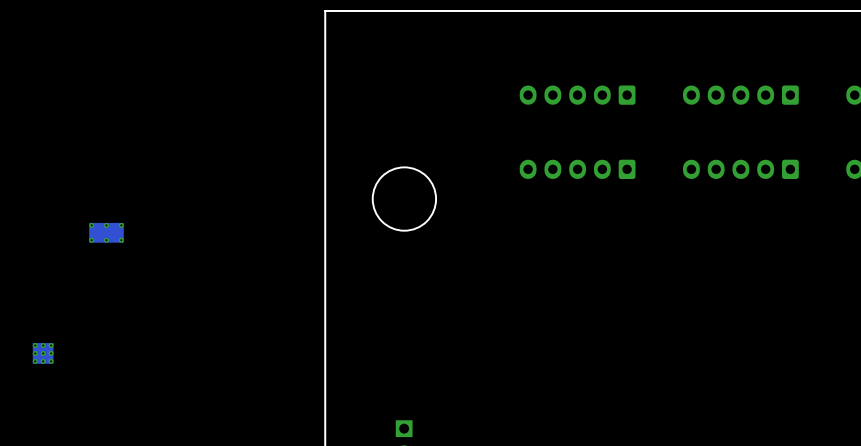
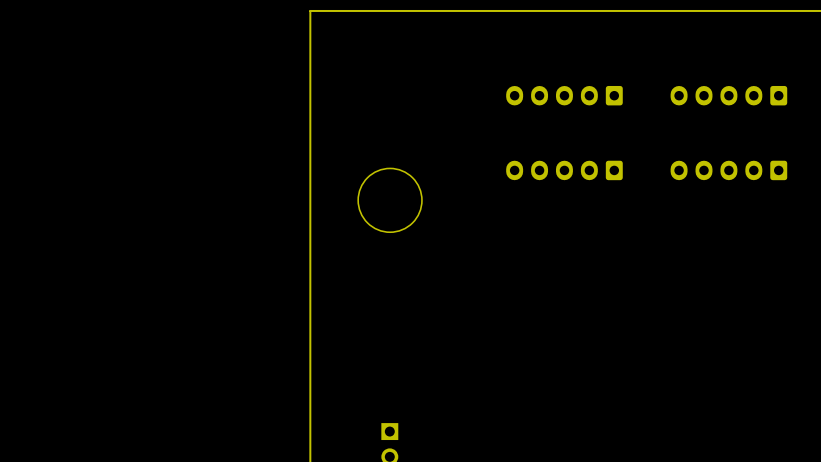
part: (106, 232) -> none
part: (43, 353) -> none

